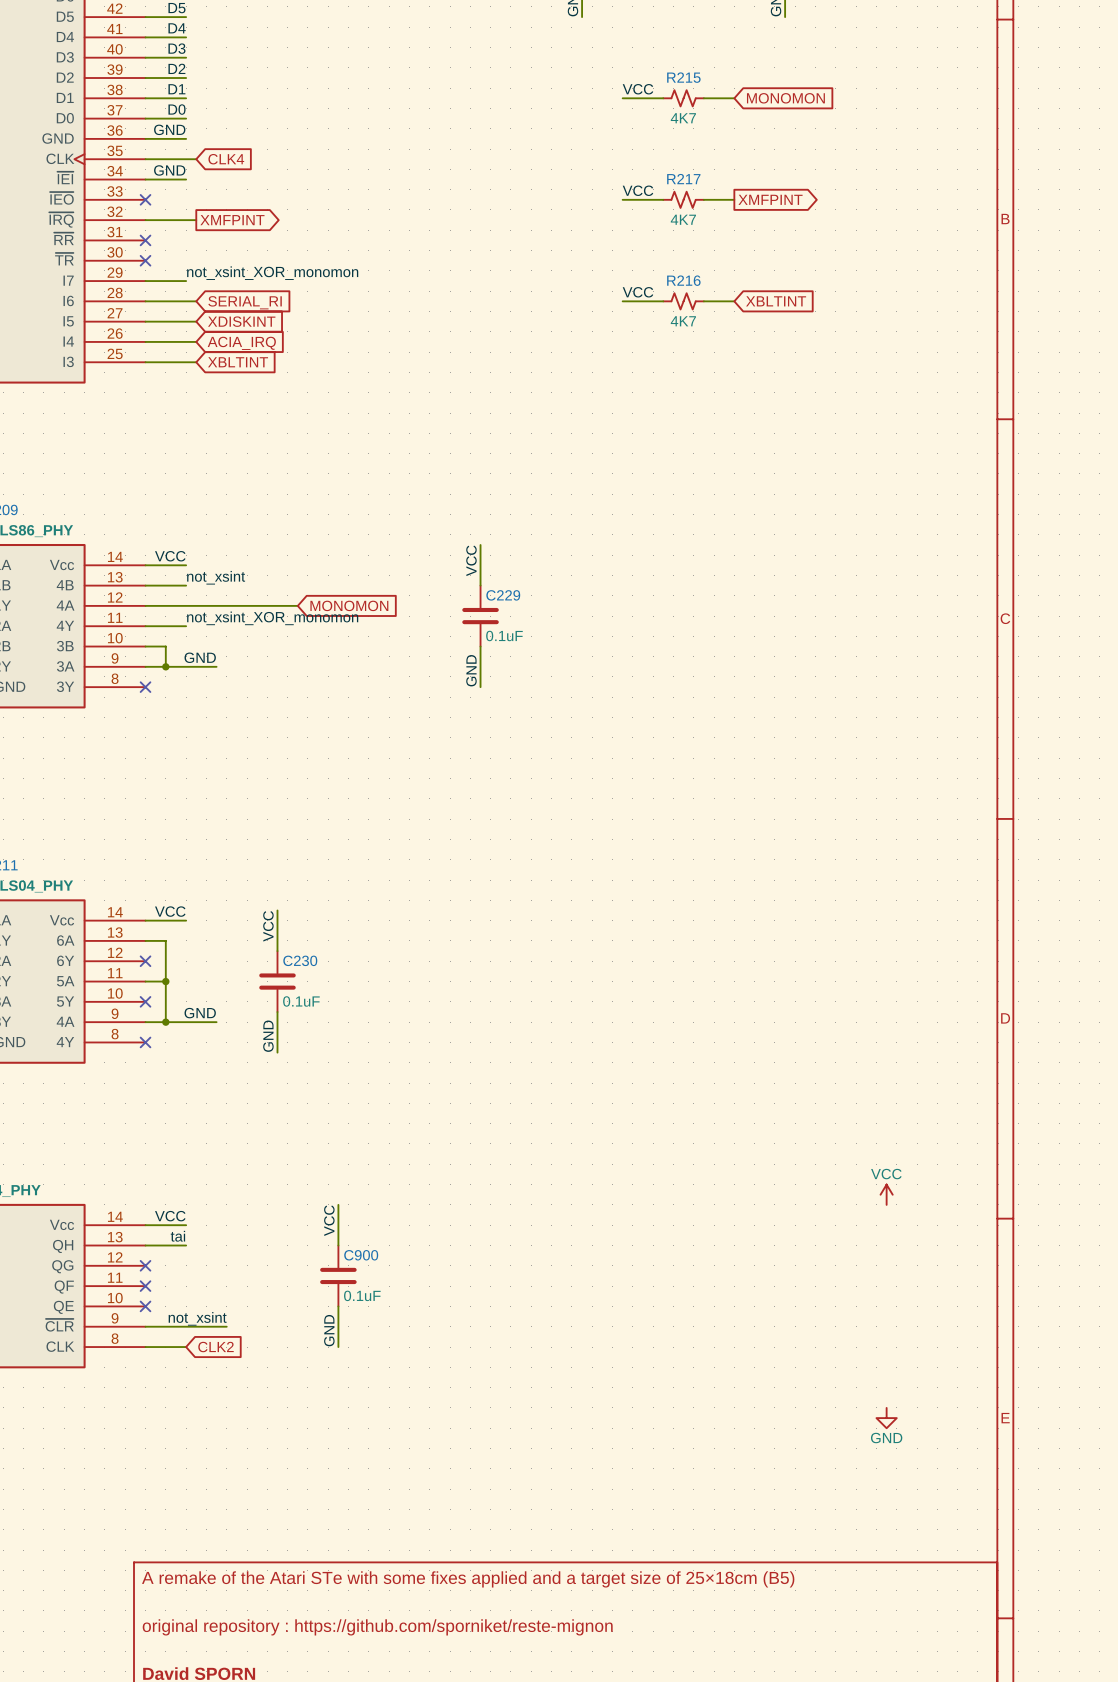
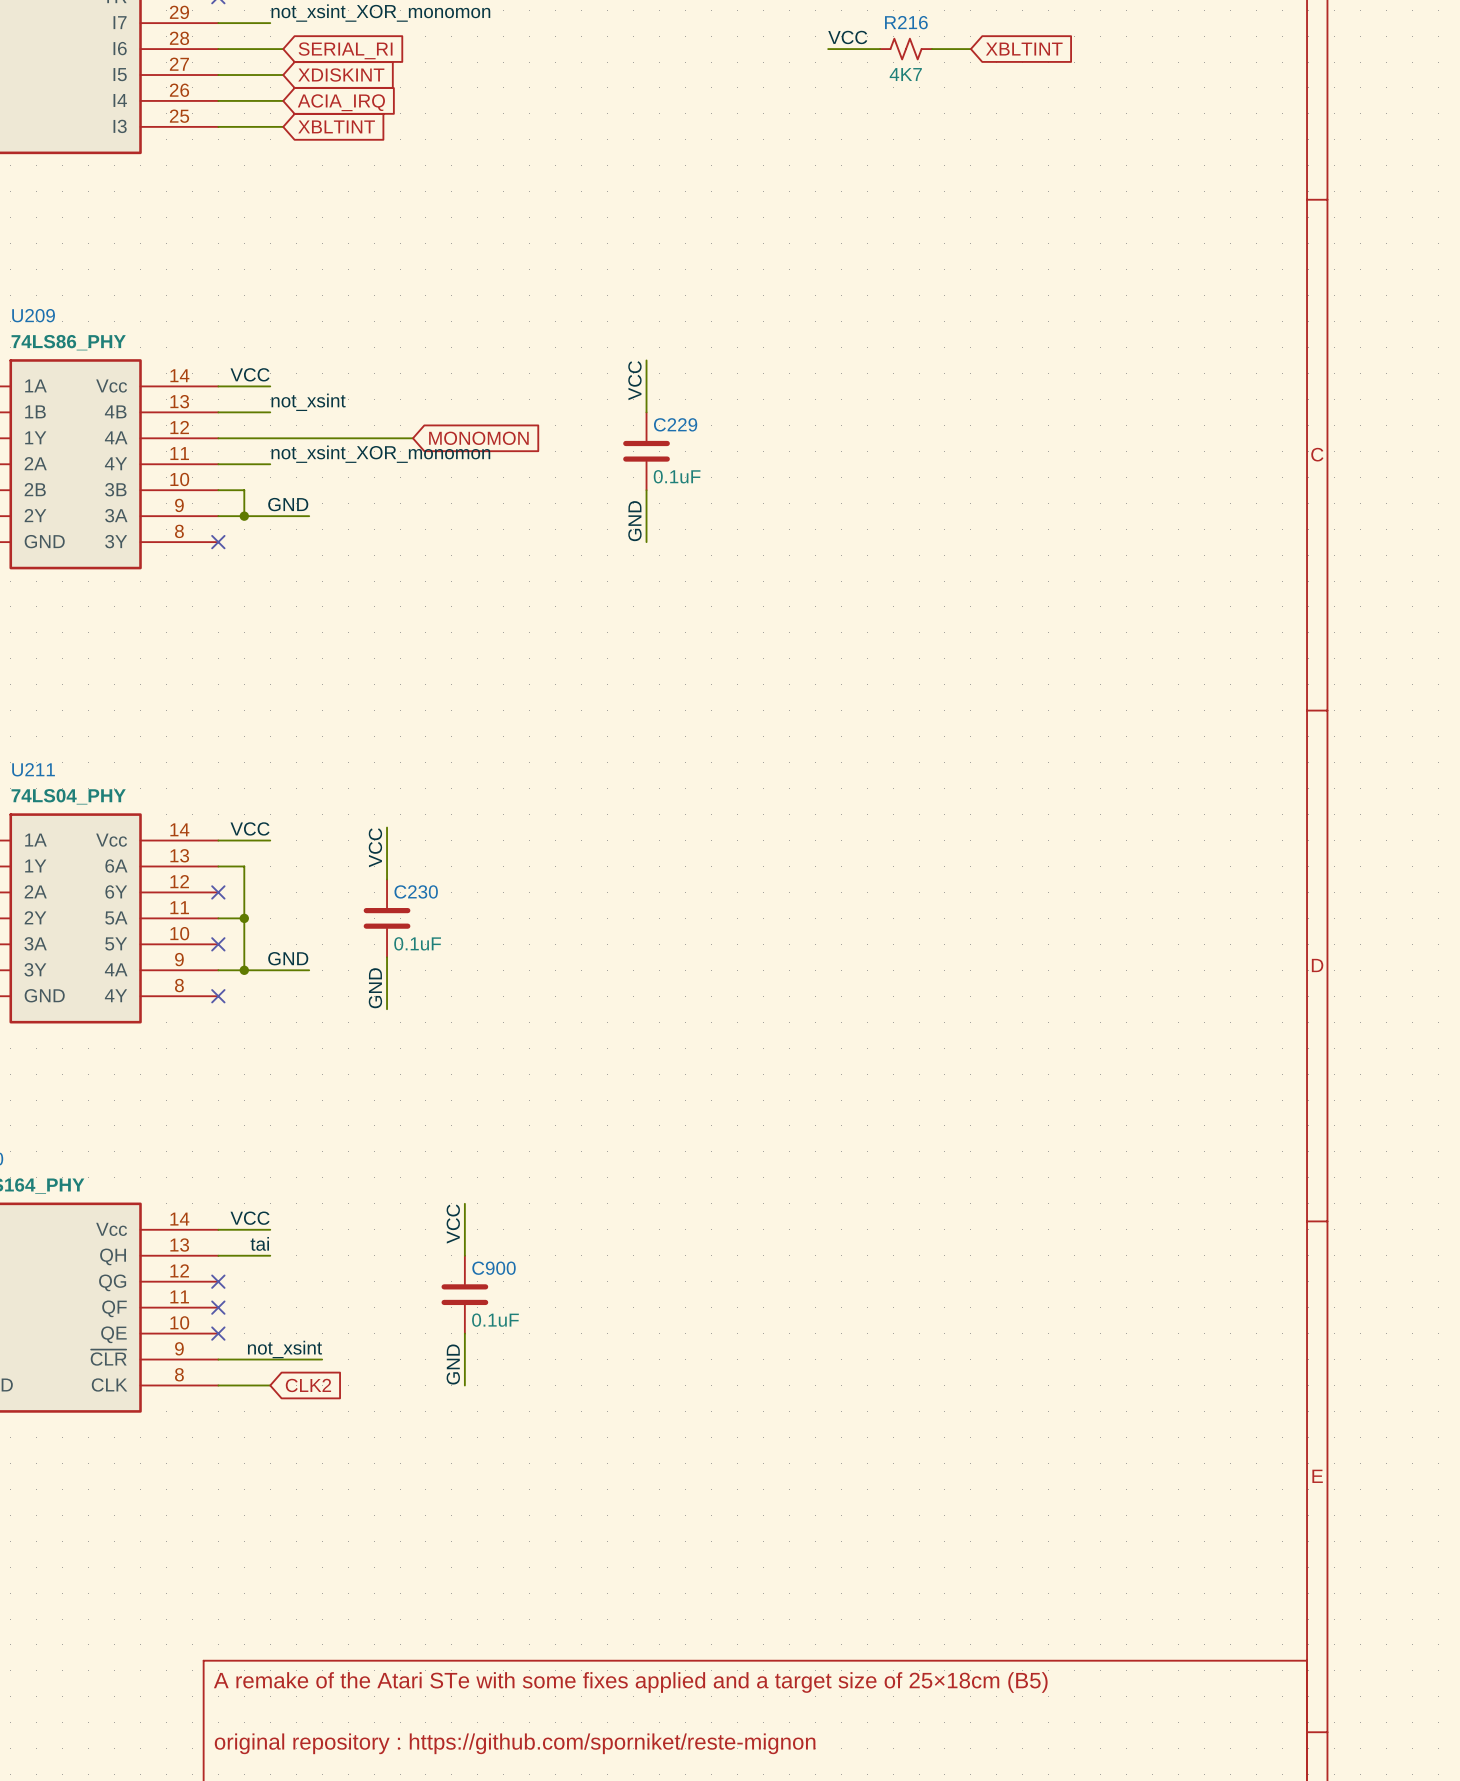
power symbol: VCC (886, 1194) -> none
power symbol: GND (886, 1418) -> none

